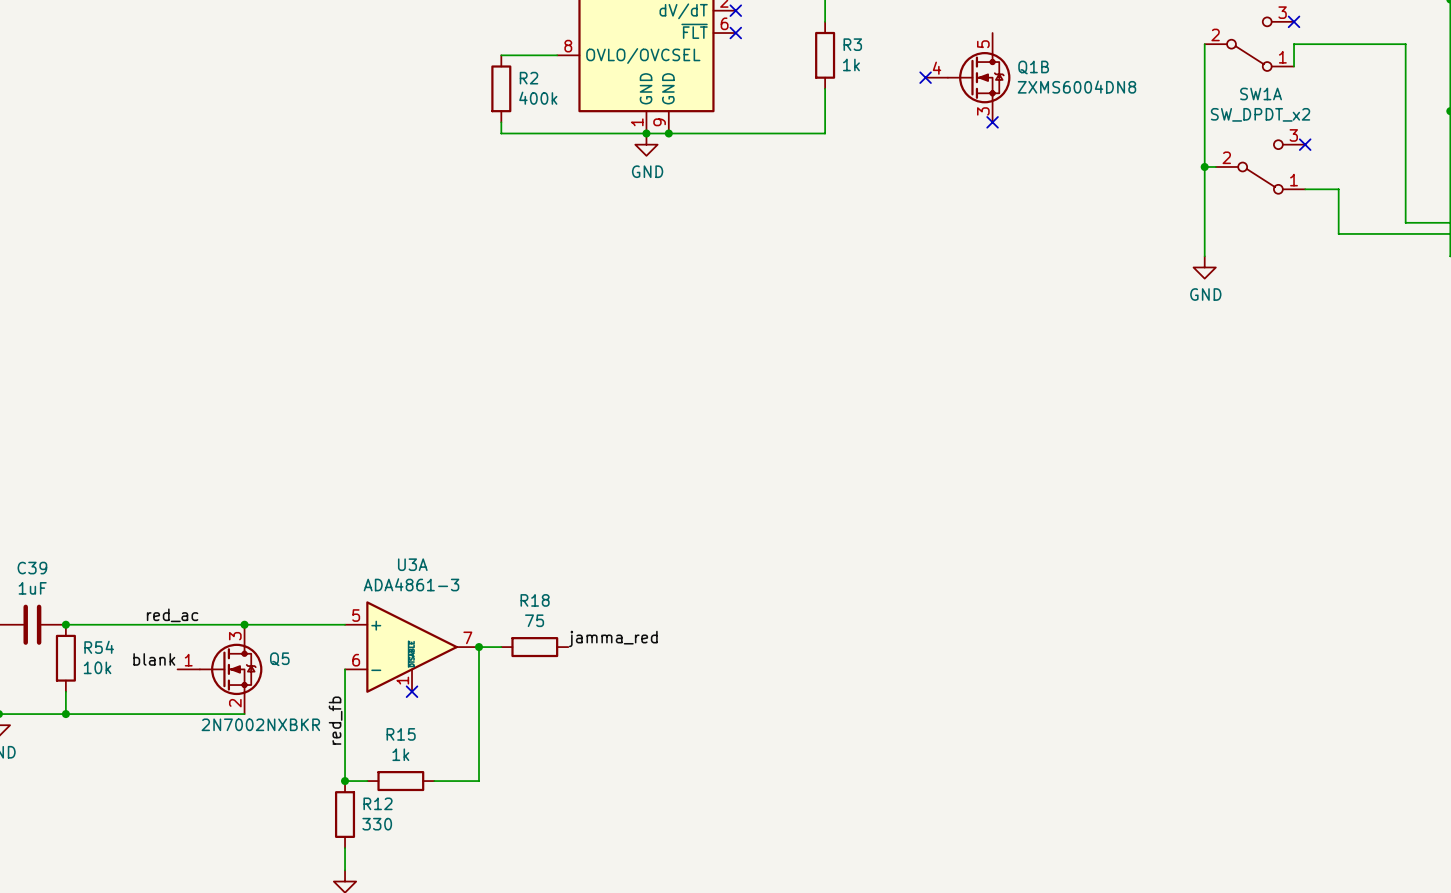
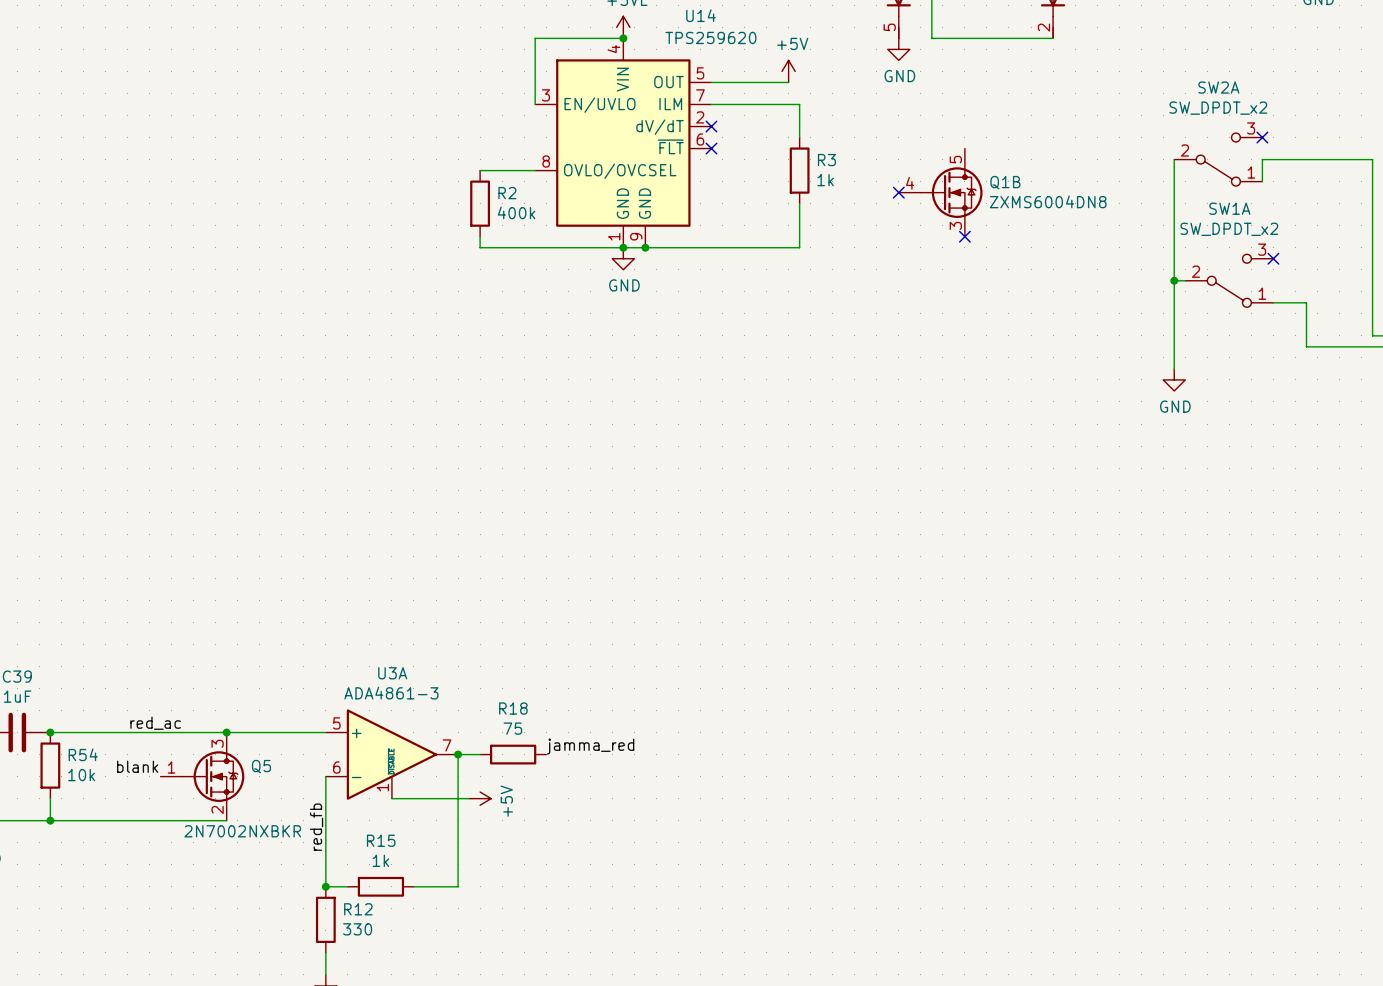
wire: none -> (391, 798) (469, 798)
no-connect mark: (412, 691) -> none
power symbol: none -> +5V (480, 798)

